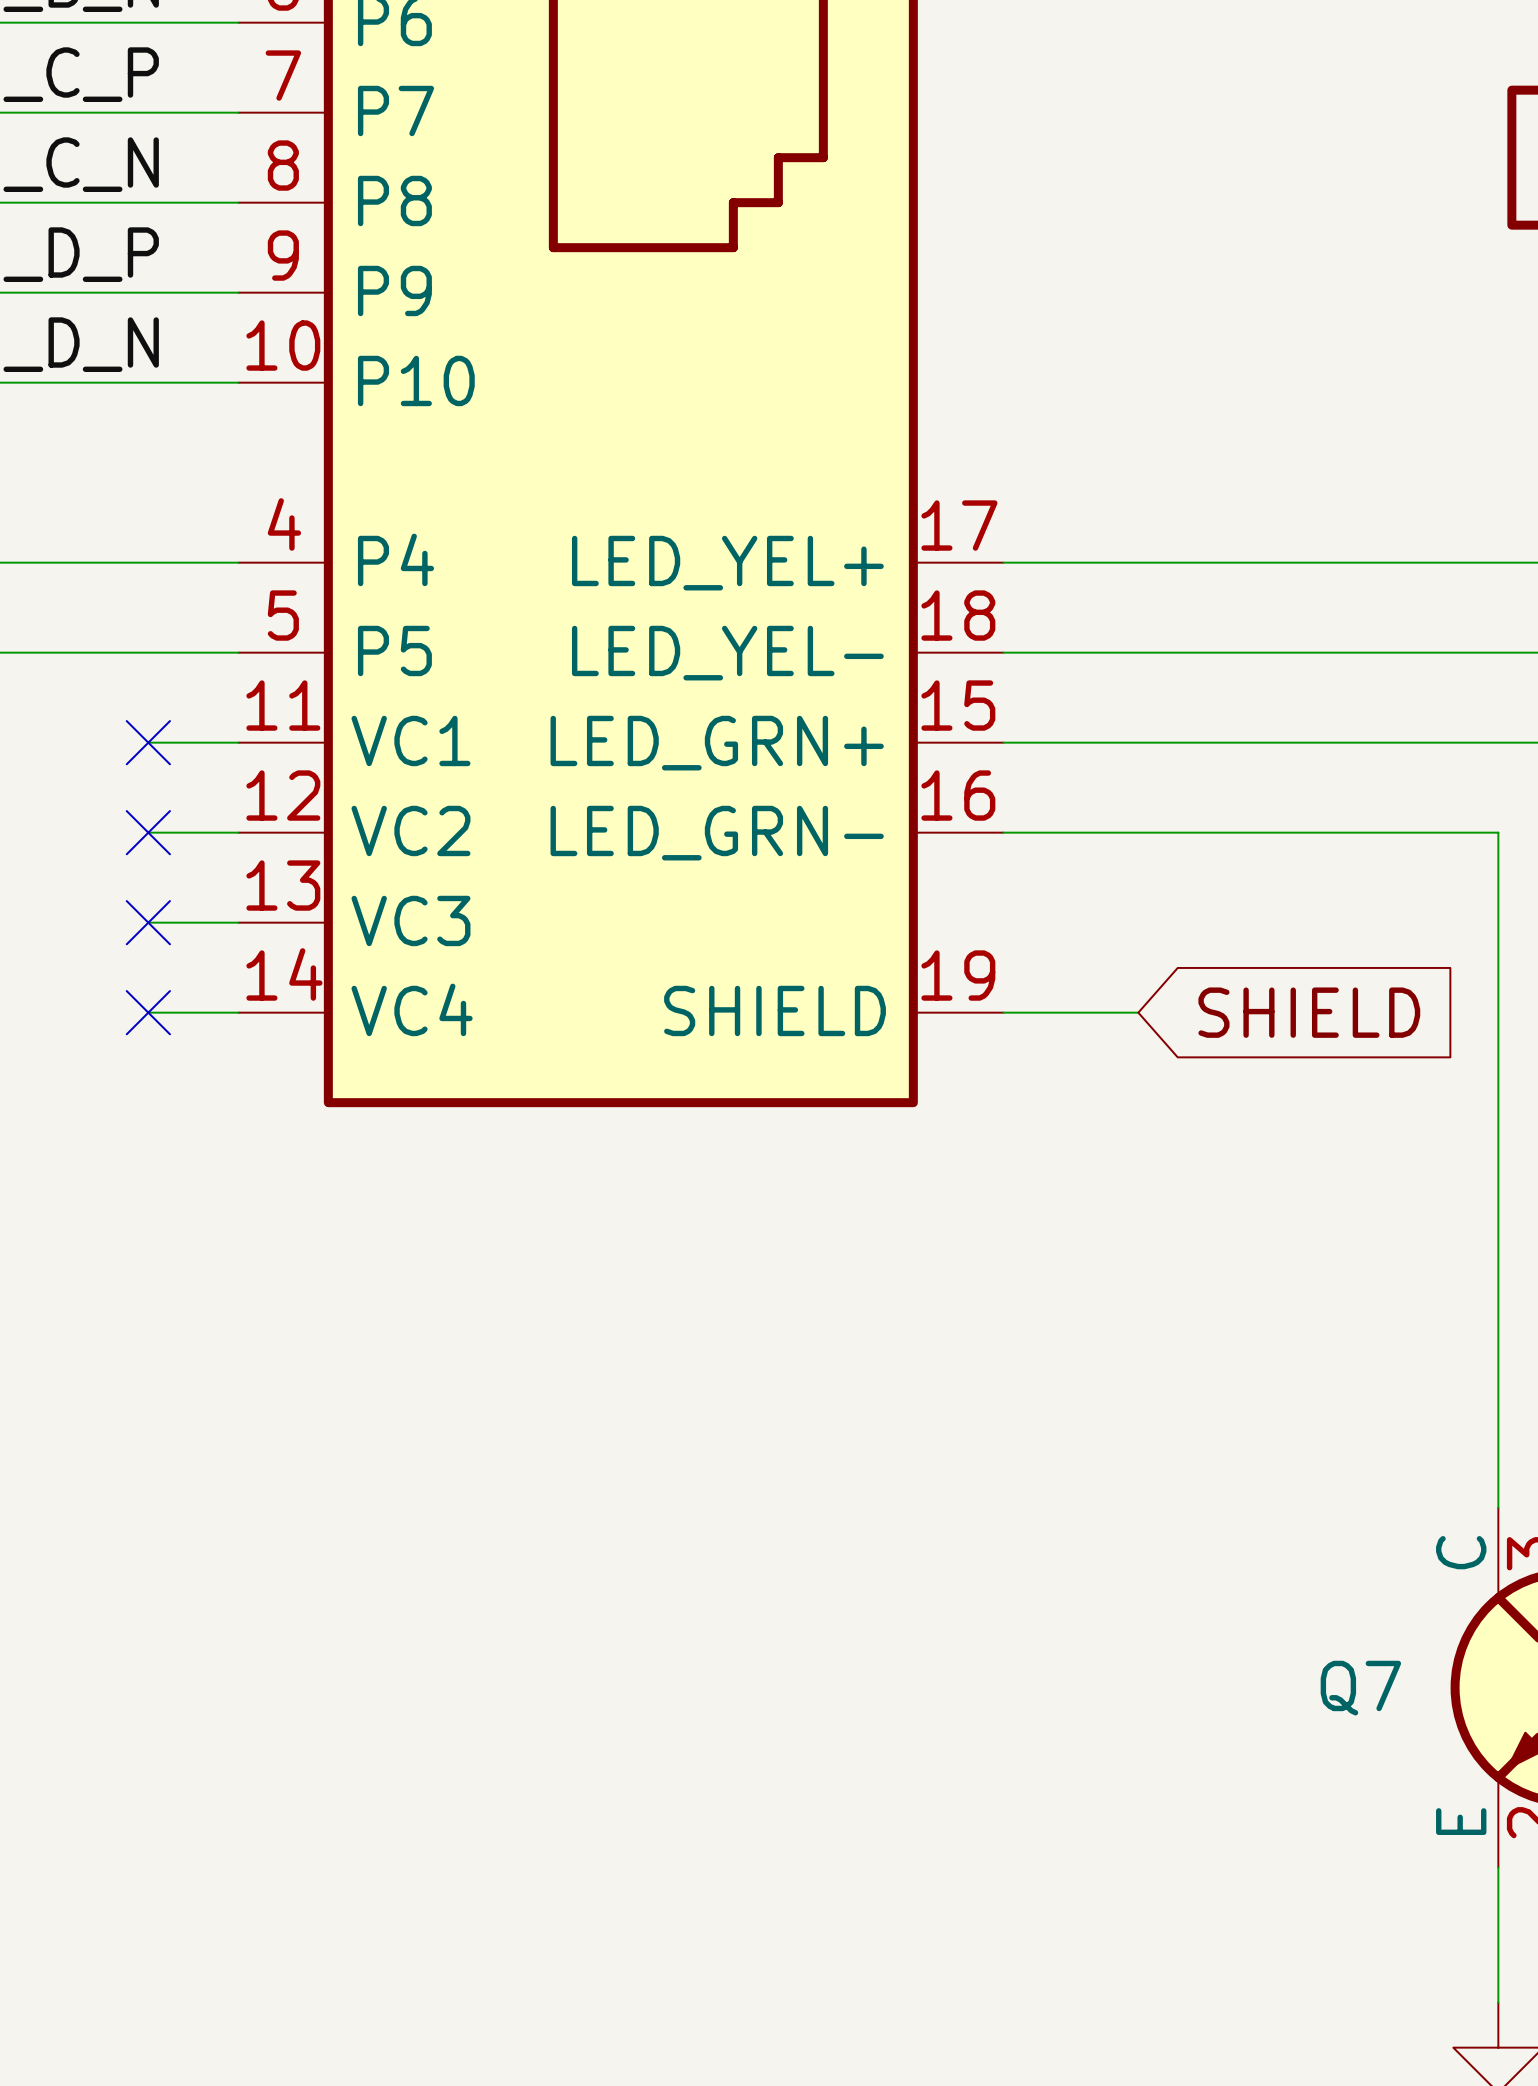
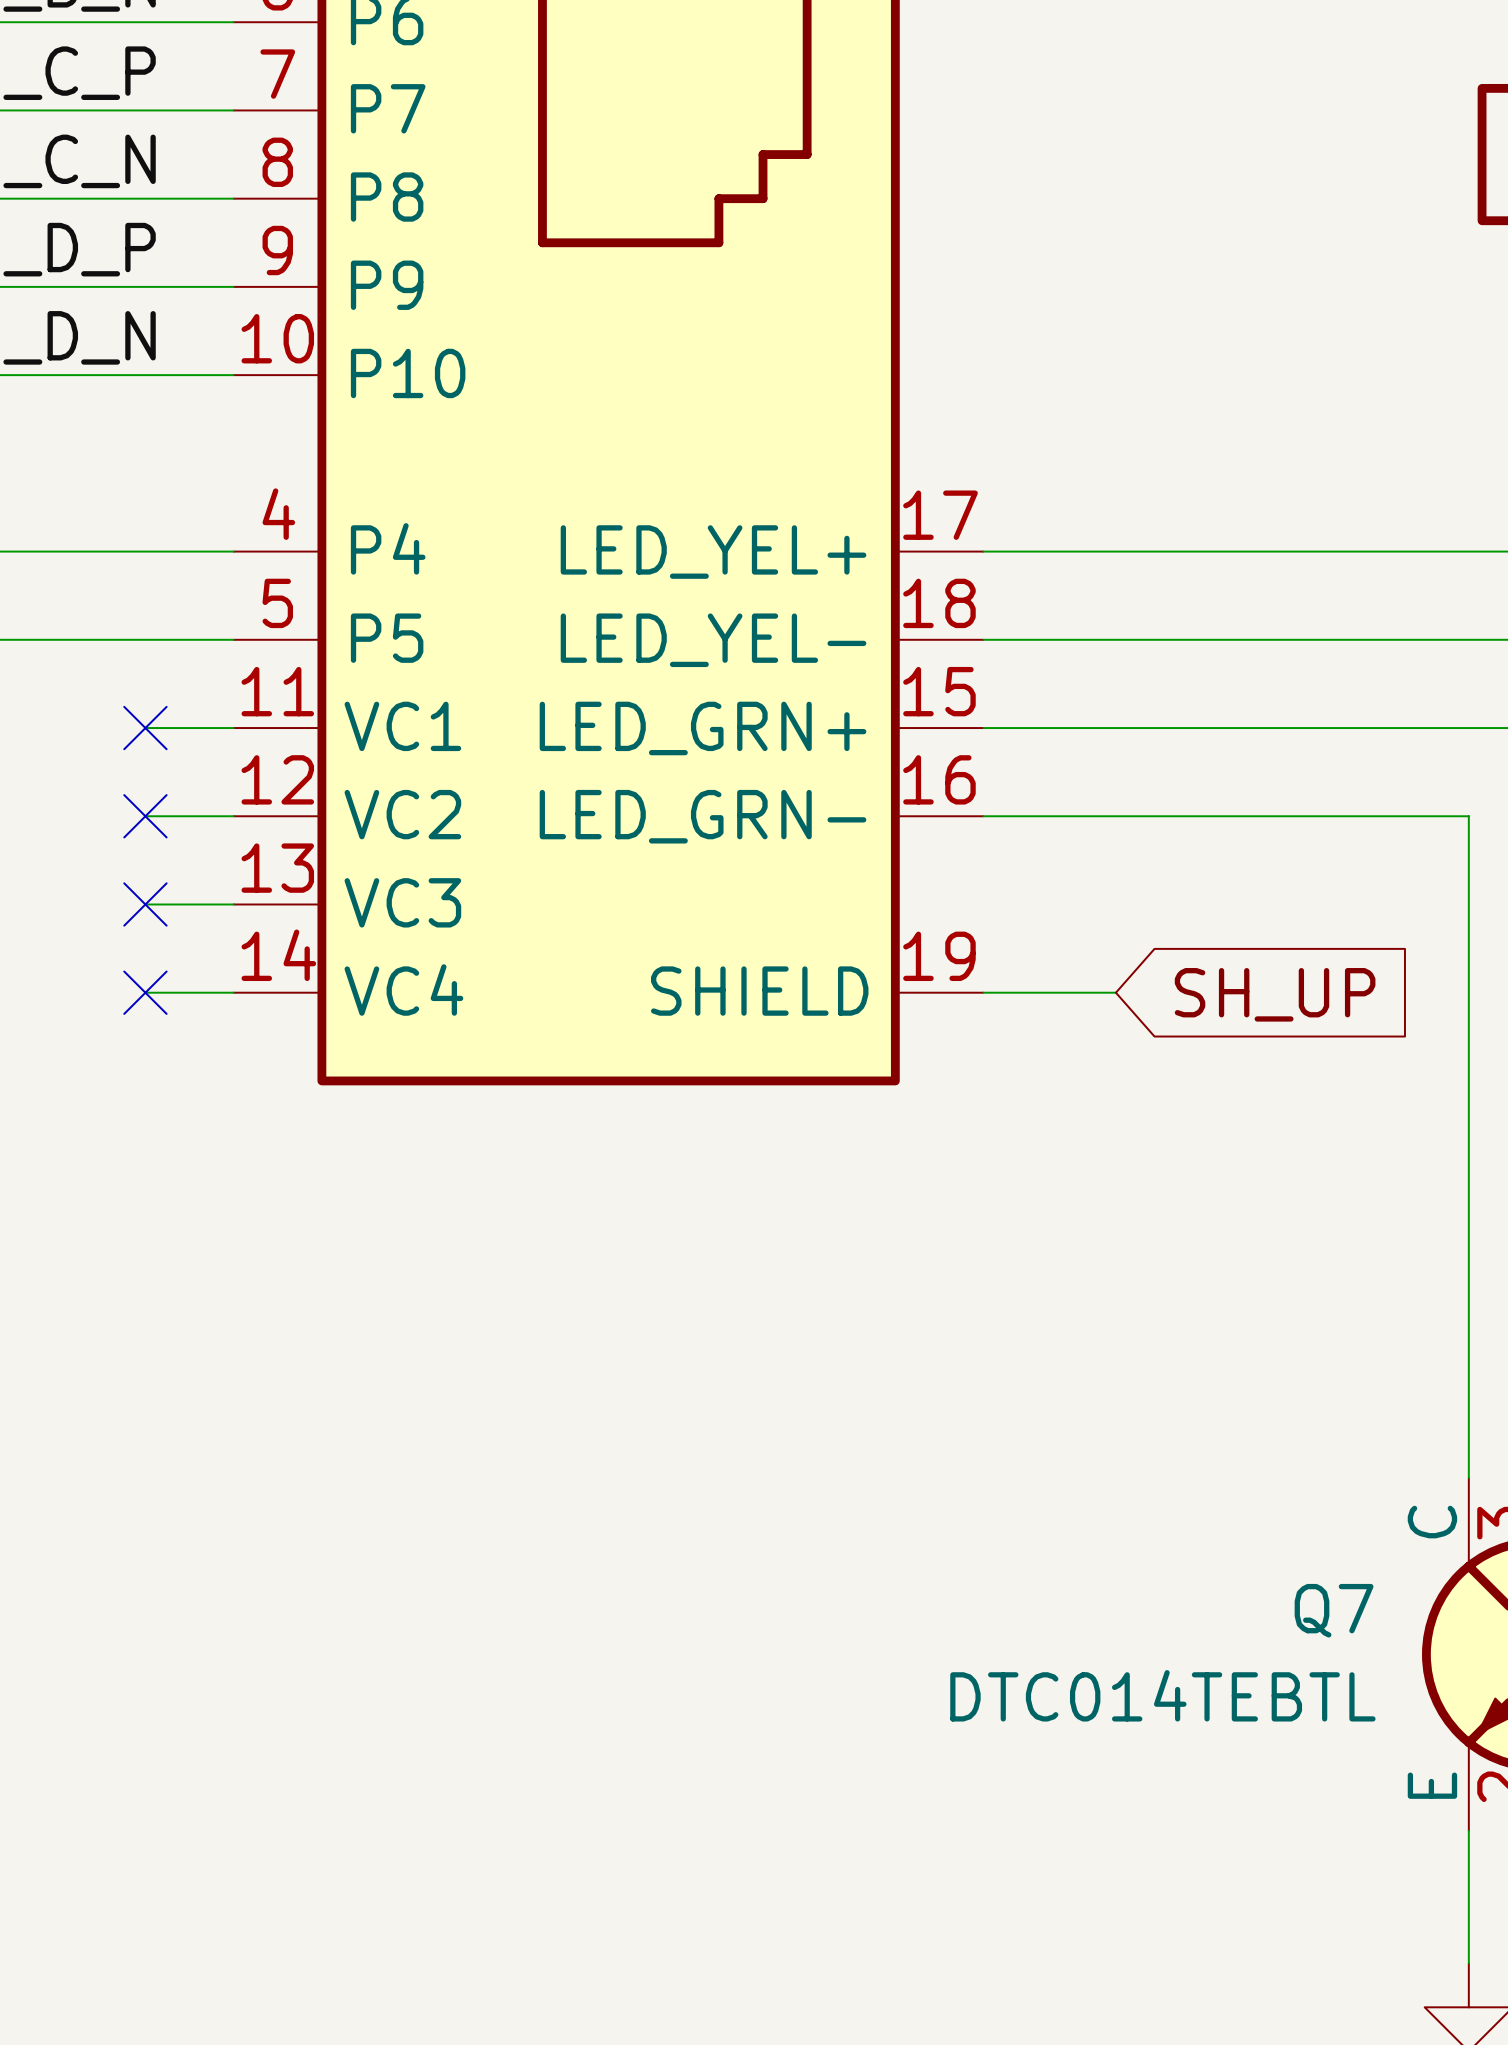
global label: SHIELD (1309, 1012) -> SH_UP (1275, 994)
Q7 name position: Q7 (1360, 1688) -> Q7 (1334, 1610)
Q7 text: none -> DTC014TEBTL (1162, 1695)

